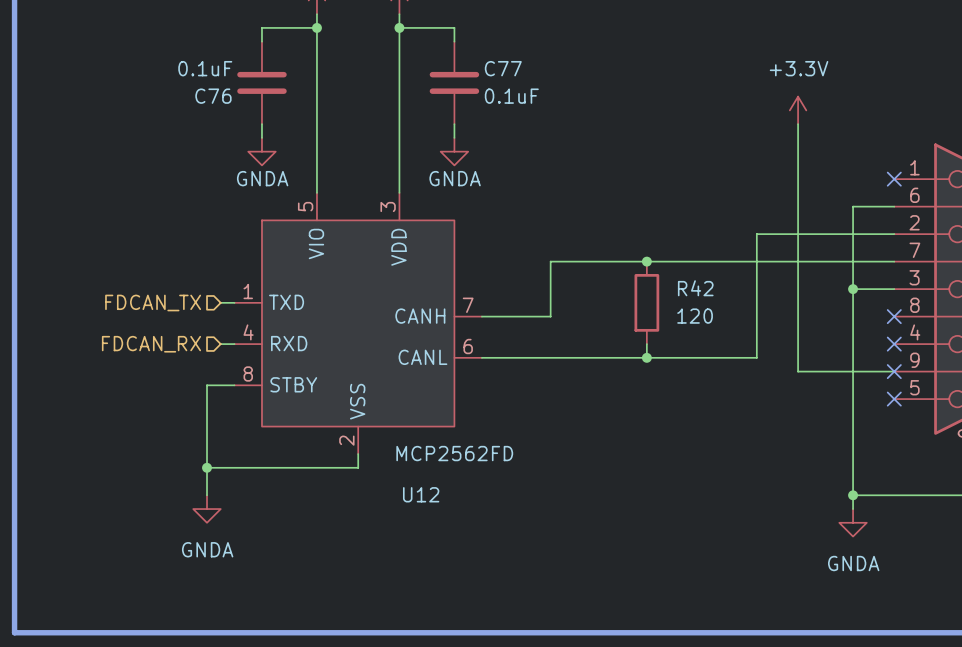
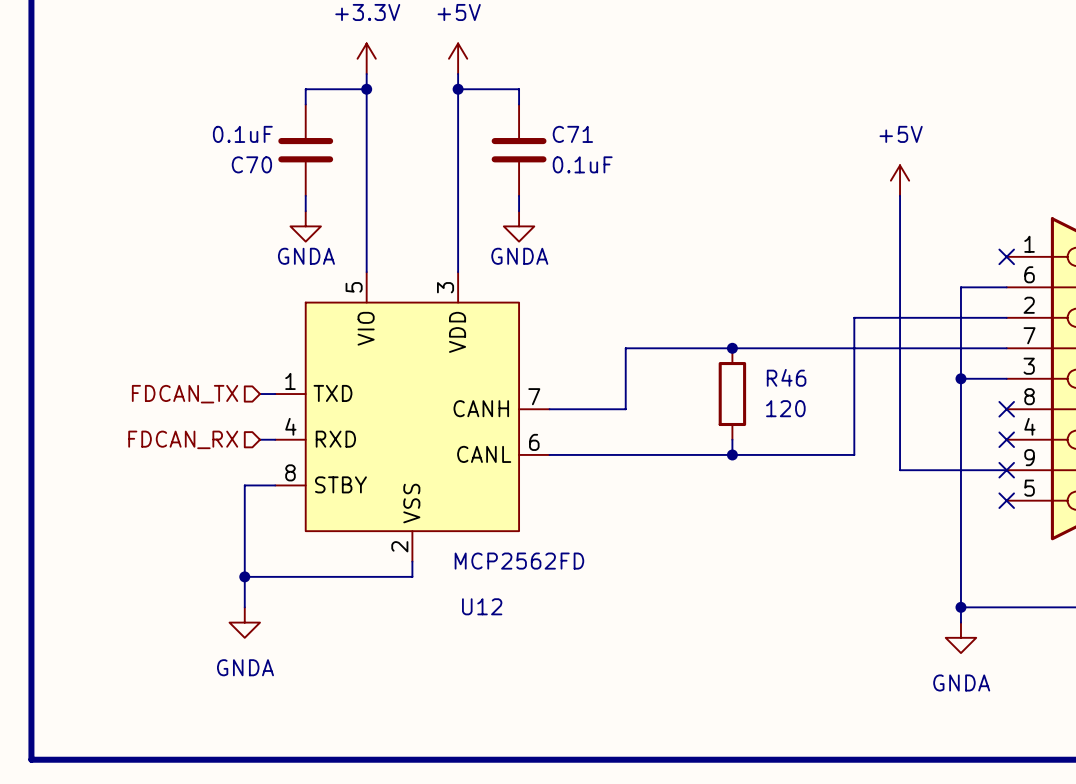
C77 name: C77 (503, 68) -> C71 (572, 134)
C76 name: C76 (213, 96) -> C70 (251, 164)
power symbol: +3.3V (798, 110) -> +5V (900, 180)
R42 name: R42 (695, 288) -> R46 (786, 377)

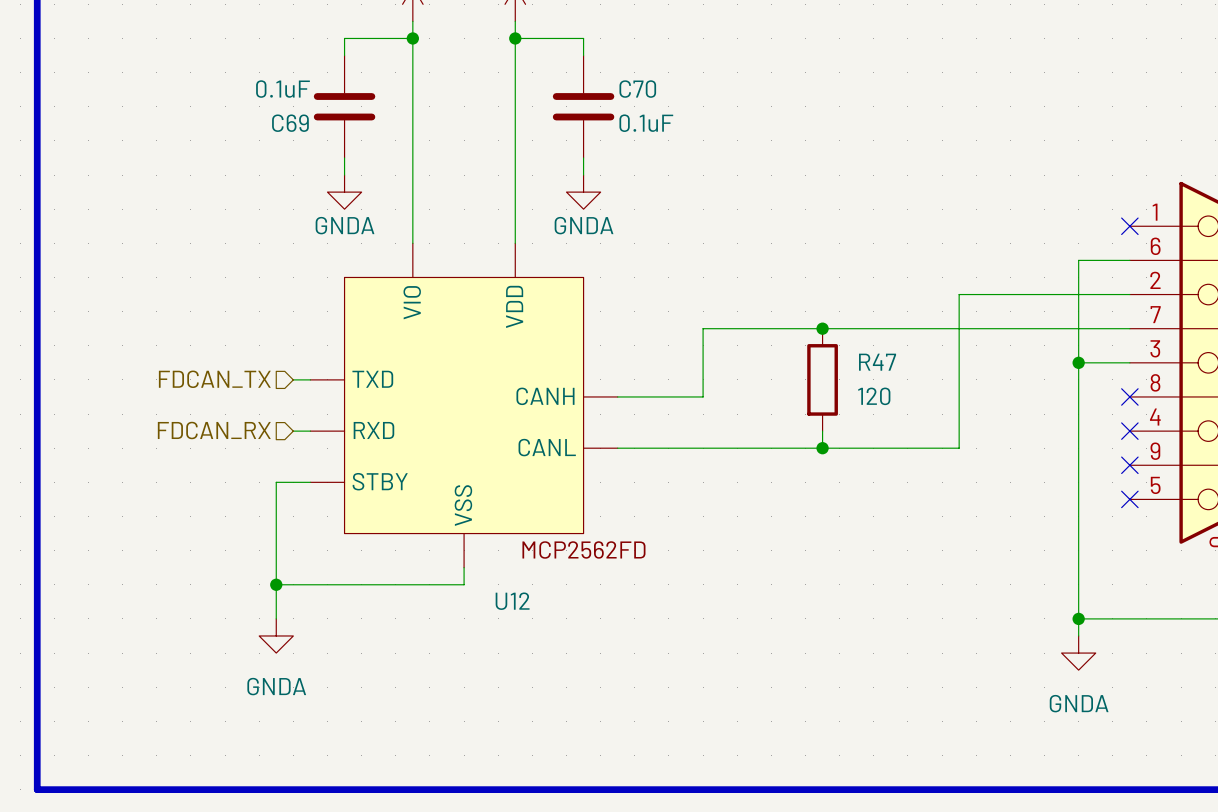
C71 name: C71 (572, 134) -> C70 (637, 89)
C70 name: C70 (251, 164) -> C69 (290, 123)
power symbol: +5V (900, 180) -> none
wire: (900, 195) (900, 470) (1006, 470) -> none
U12 symbol: [275, 272, 550, 562] -> [310, 243, 618, 568]
R46 name: R46 (786, 377) -> R47 (877, 362)
U12 value: MCP2562FD (519, 561) -> none
U12 name position: U12 (482, 606) -> U12 (512, 601)

